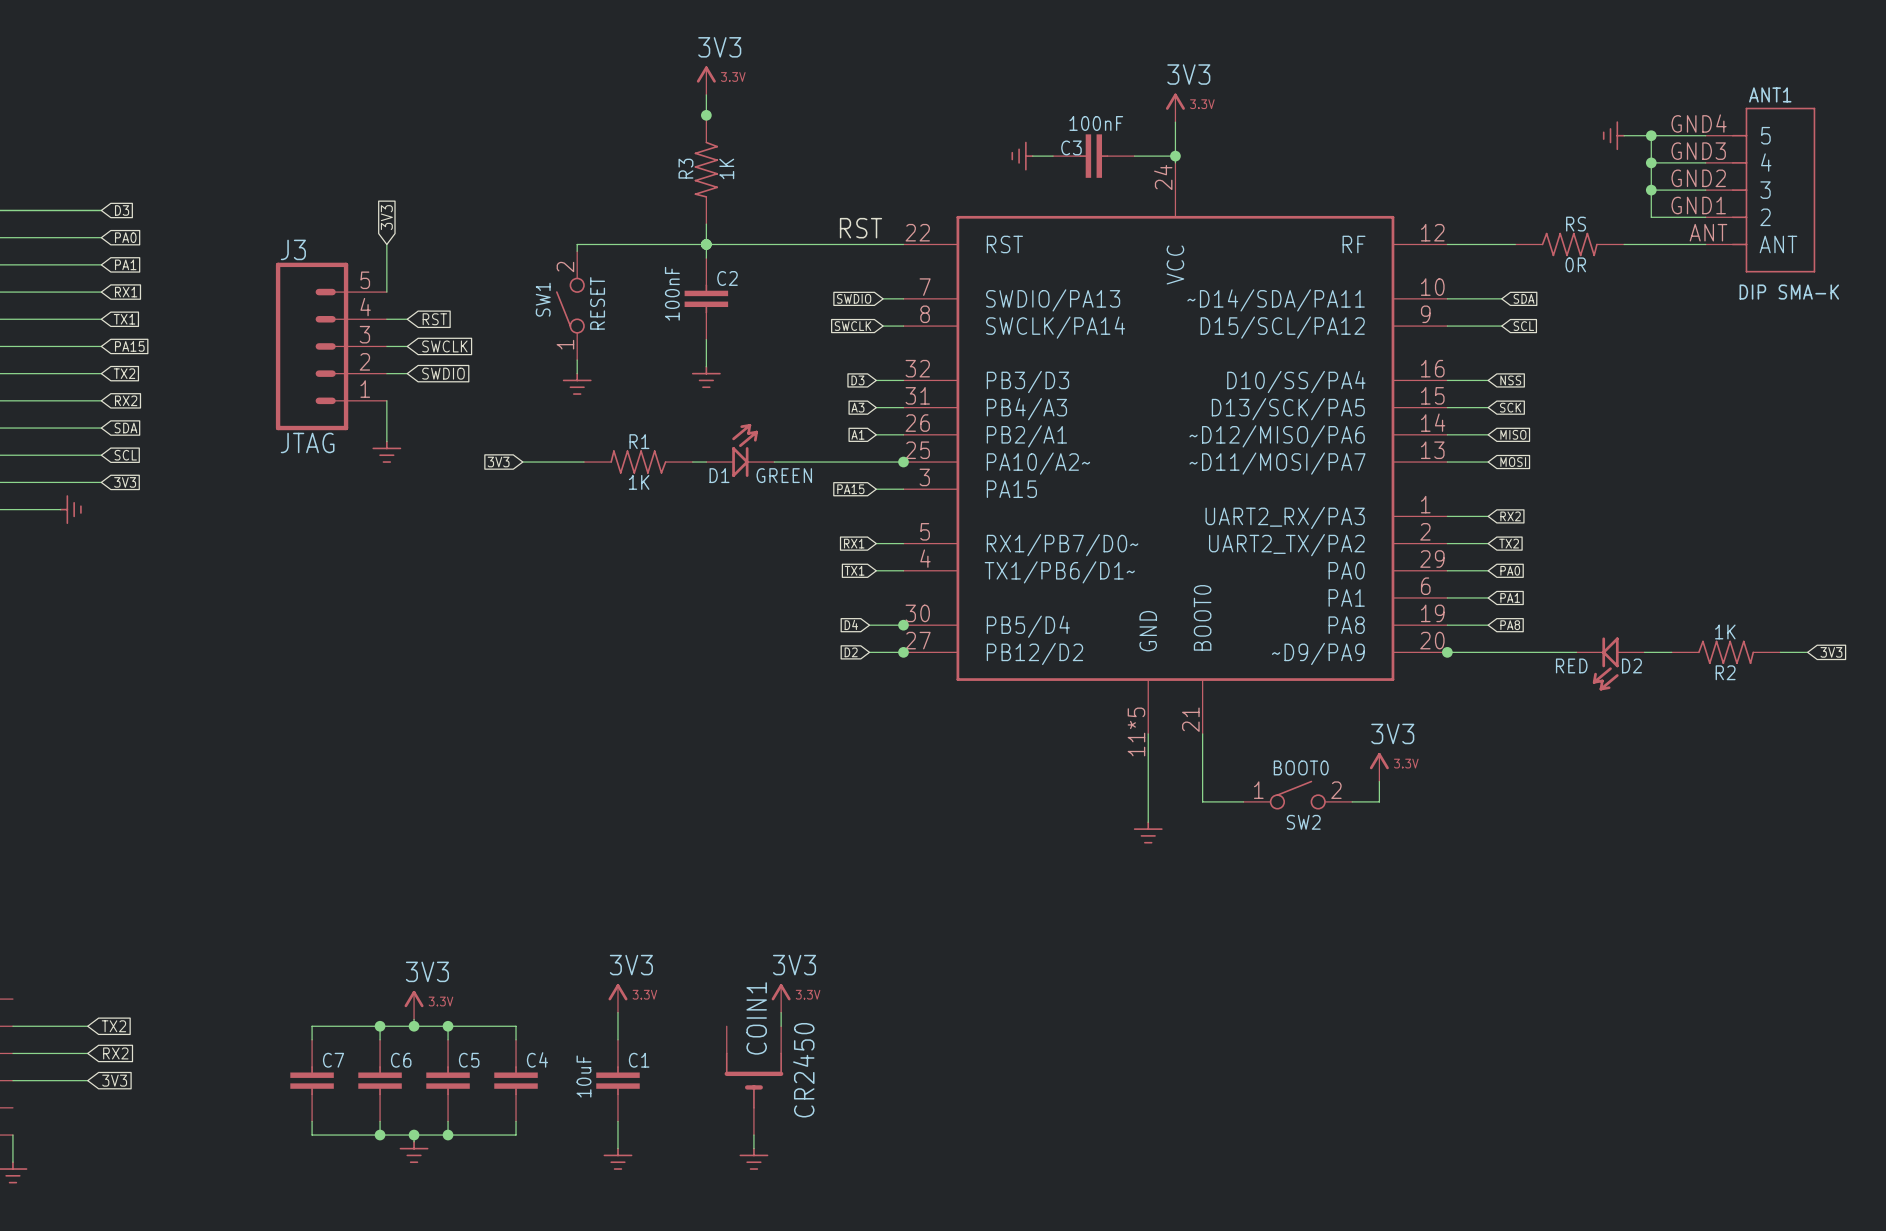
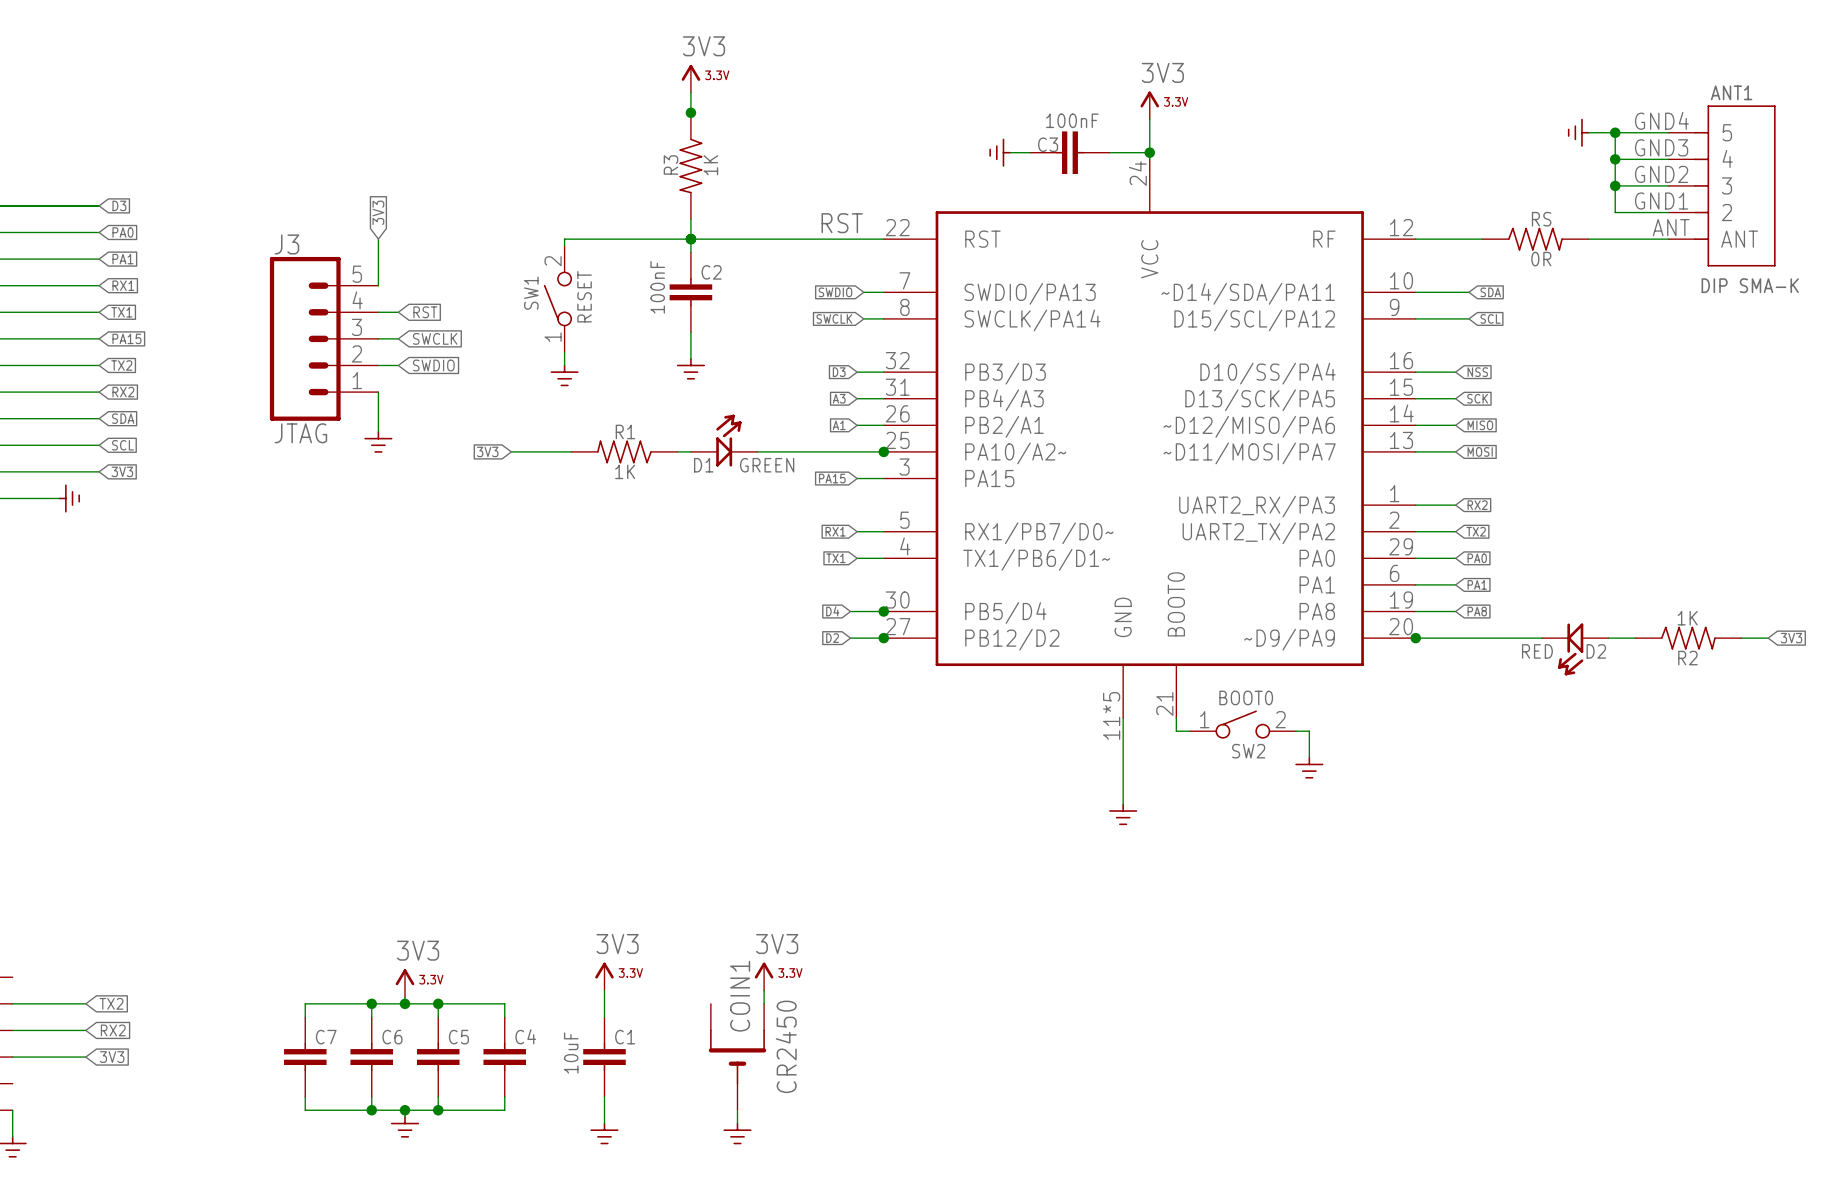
wire: (1202, 747) (1202, 801) (1243, 801) -> (1176, 731) (1189, 731)
wire: none -> (1296, 731) (1309, 731) (1309, 757)
power symbol: 3V3 (1379, 767) -> none
wire: (1379, 781) (1379, 801) (1352, 801) -> none
power symbol: none -> (1309, 767)
SW2 position: (1297, 795) -> (1242, 724)

